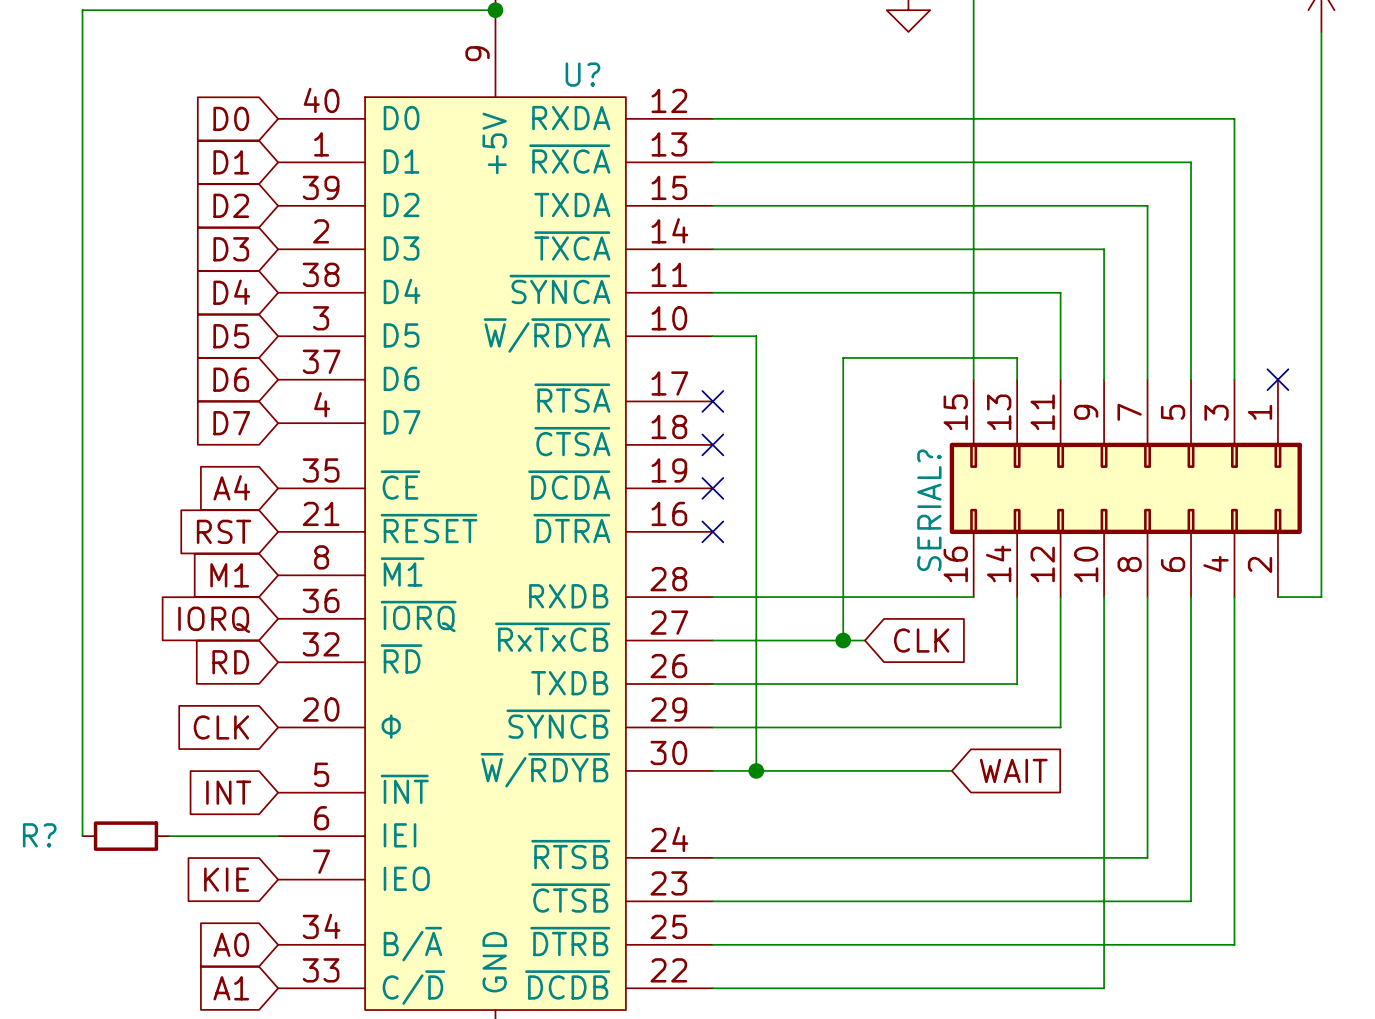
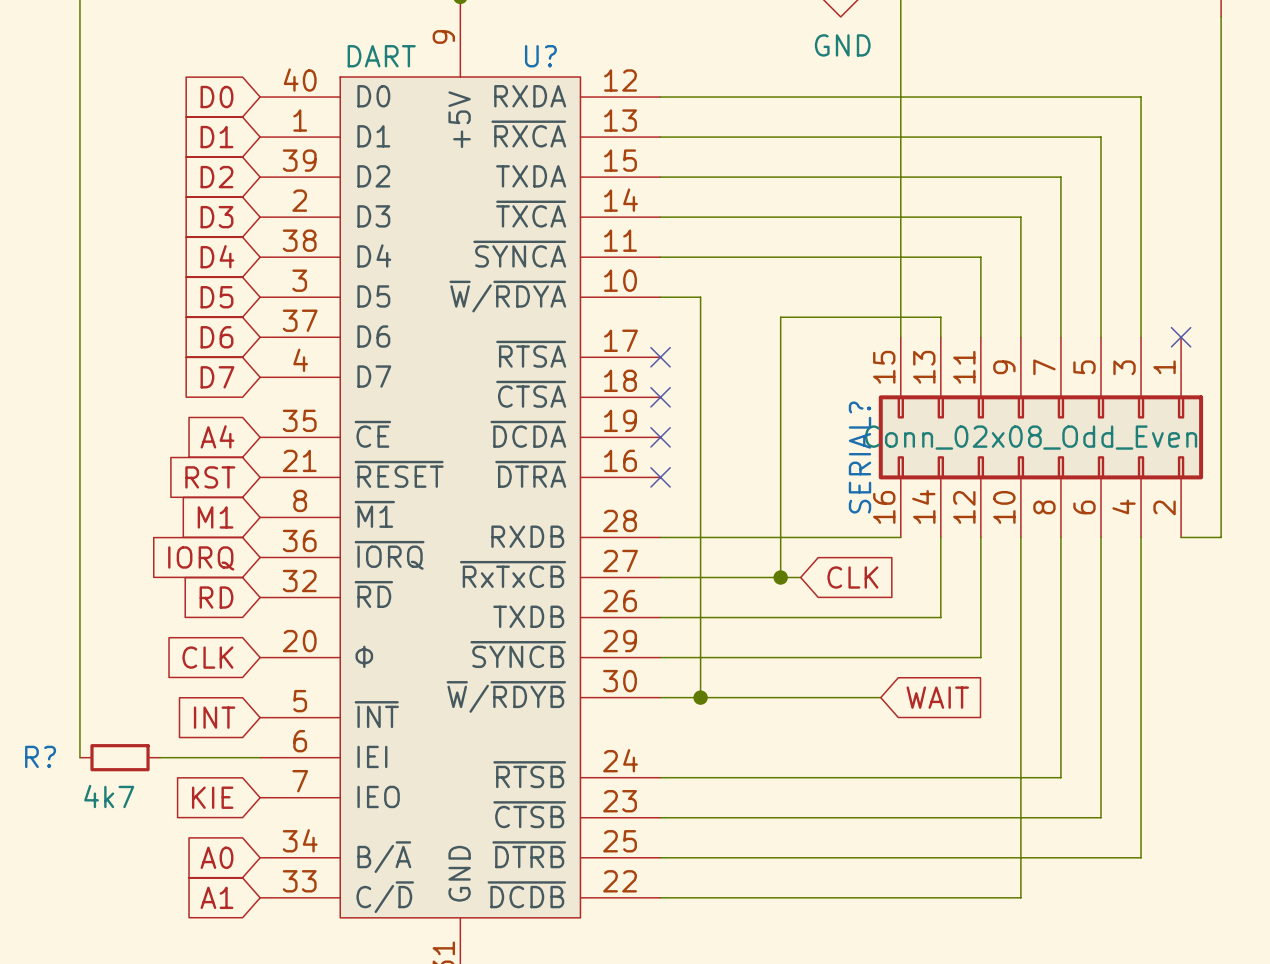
power symbol text: none -> GND (842, 45)
U? value: none -> DART (381, 56)
SERIAL? value: none -> Conn_02x08_Odd_Even (1031, 437)
R? value: none -> 4k7 (109, 796)

